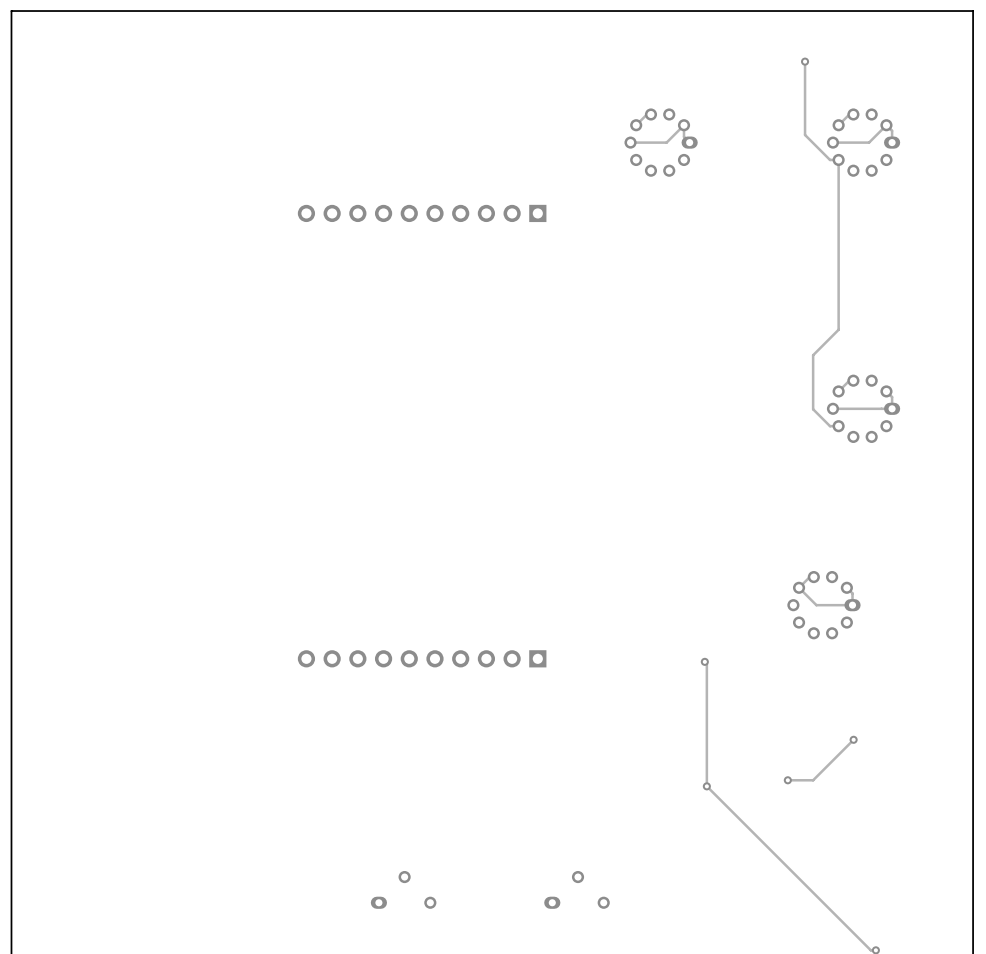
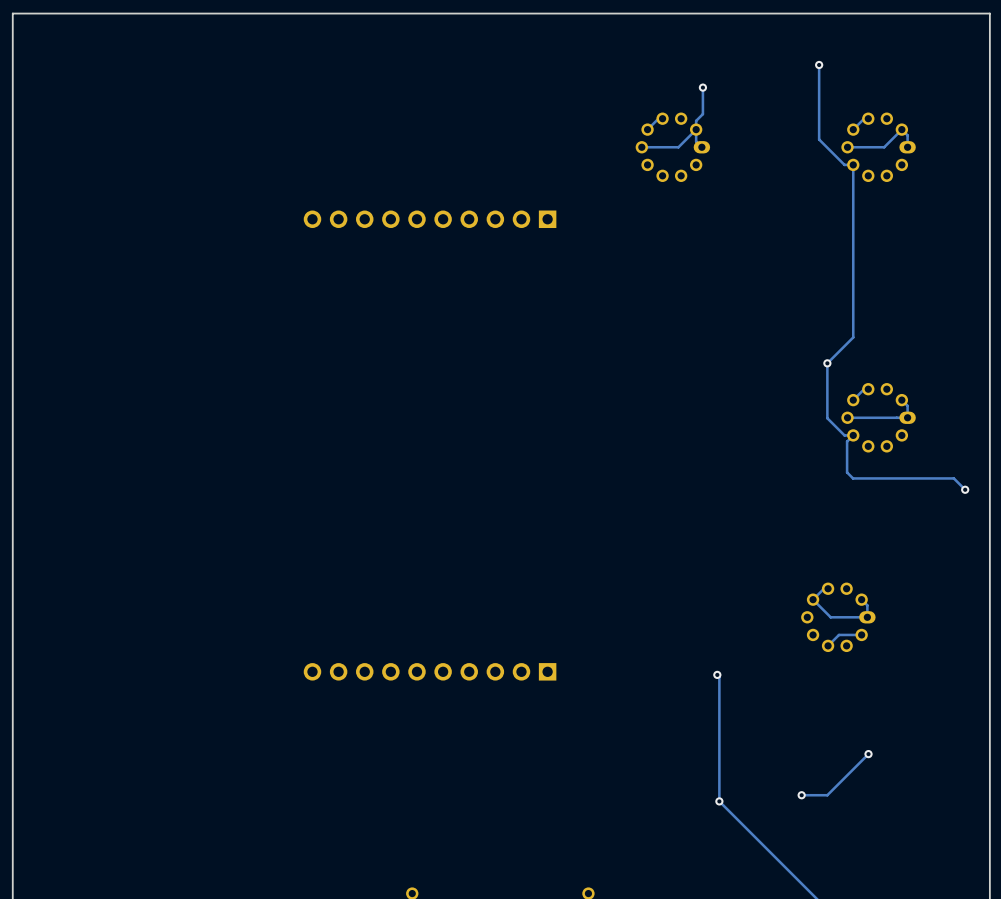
track: none -> (702, 87) (702, 114) (696, 120) (696, 129)
via: none -> (702, 87)
via: none -> (827, 363)
track: none -> (853, 435) (847, 441) (847, 472) (853, 478) (953, 478) (965, 489)
via: none -> (965, 489)
track: none -> (861, 634) (838, 634) (828, 645)

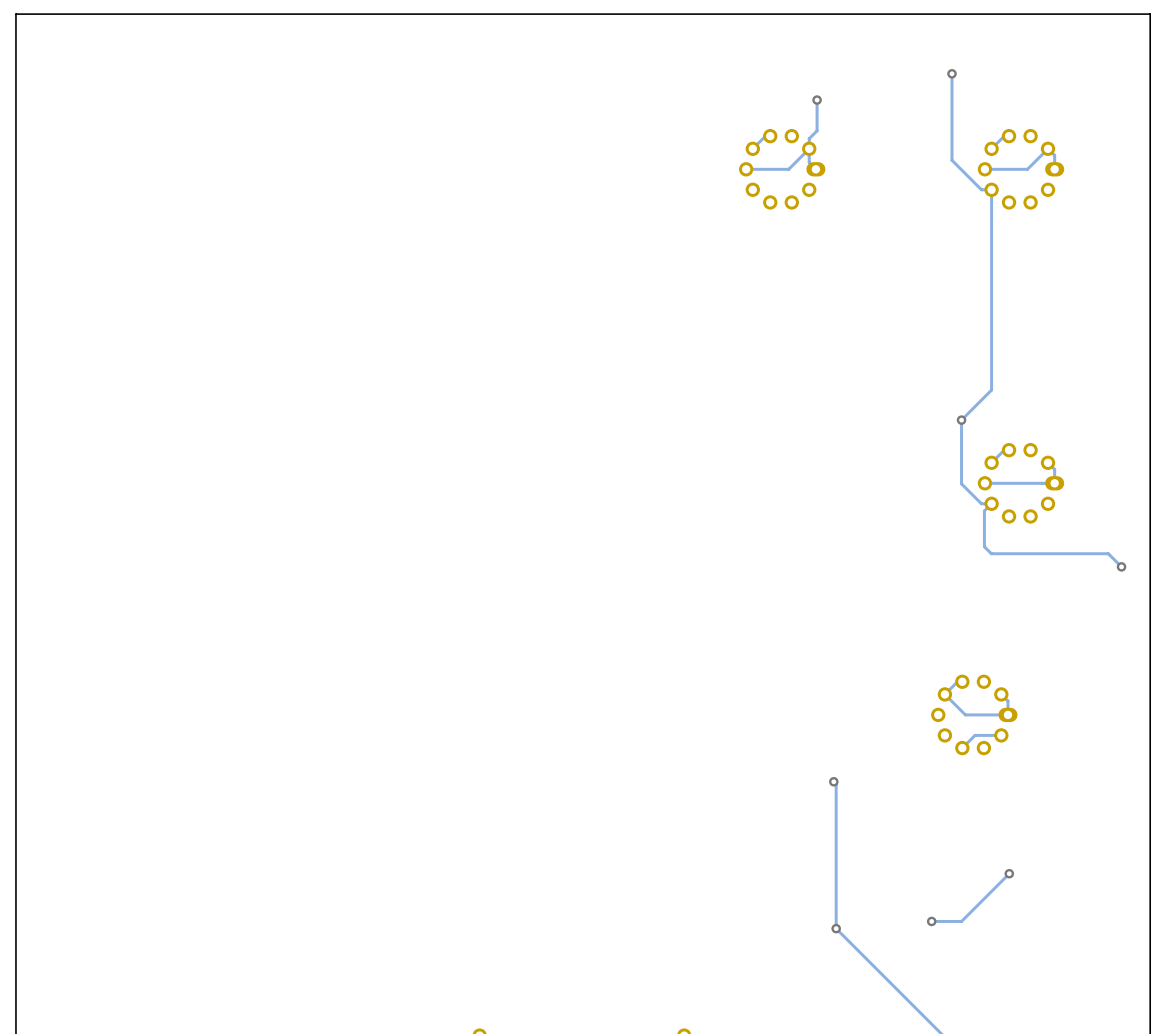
part: (430, 219) -> none
part: (430, 671) -> none

